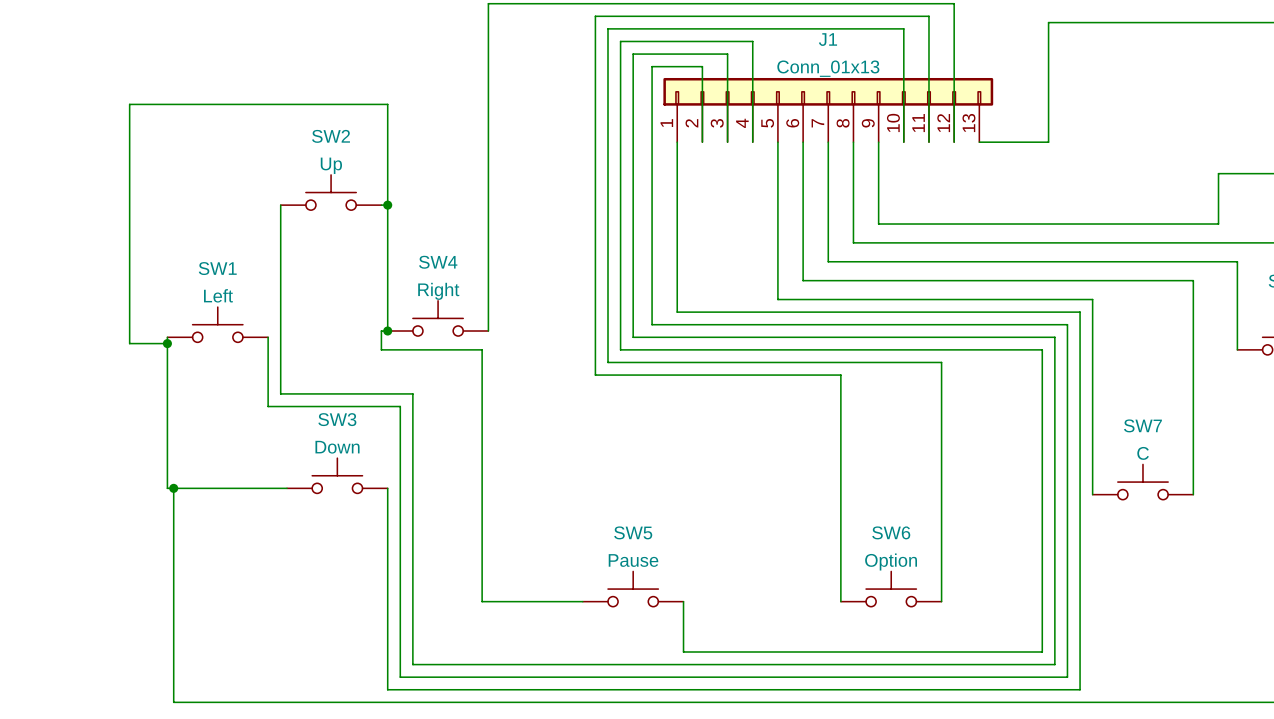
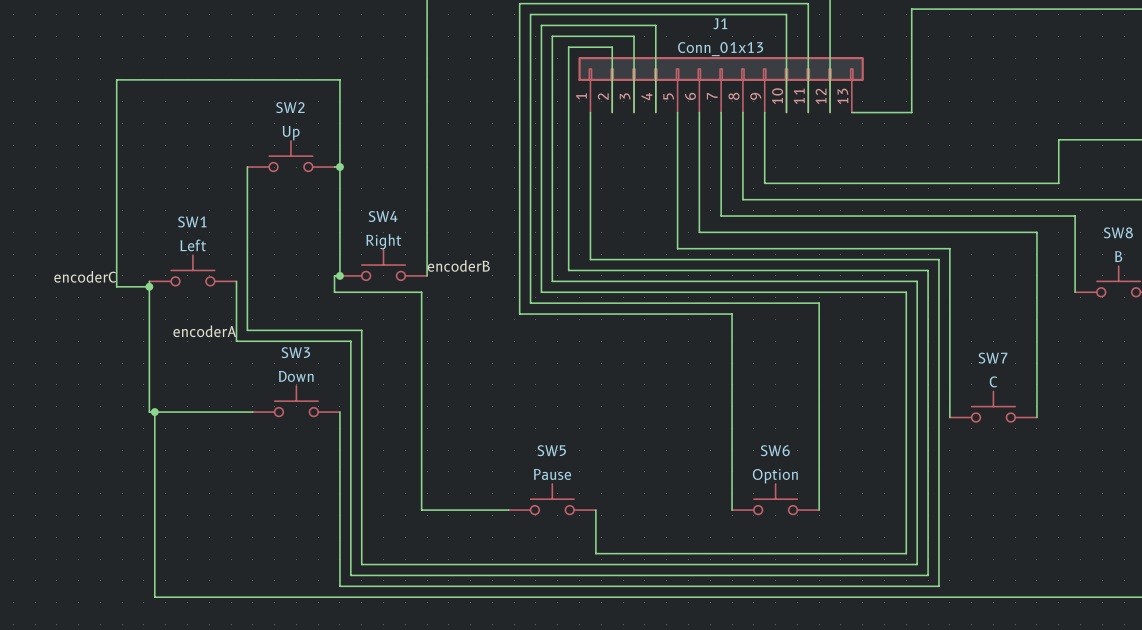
label: none -> encoderB (458, 265)
label: none -> encoderC (85, 276)
label: none -> encoderA (204, 331)

